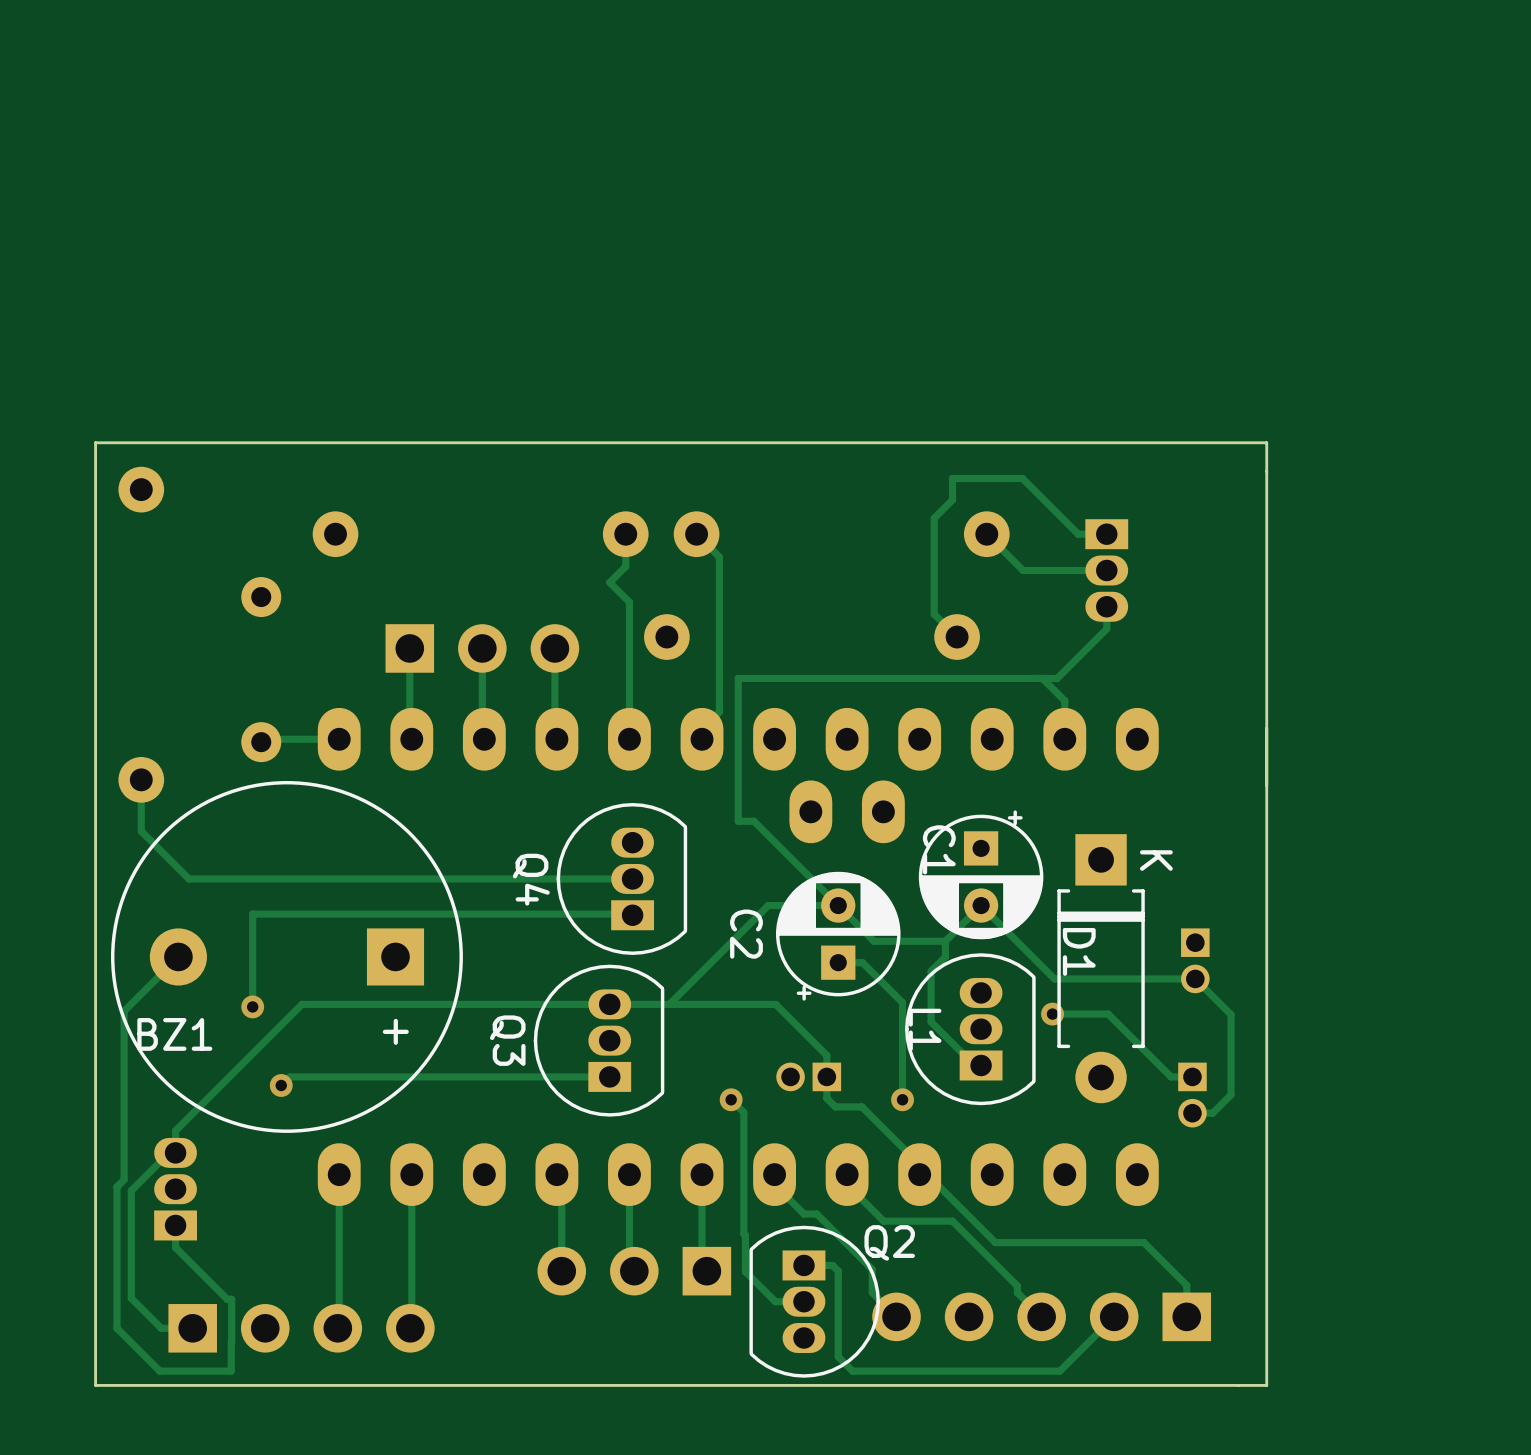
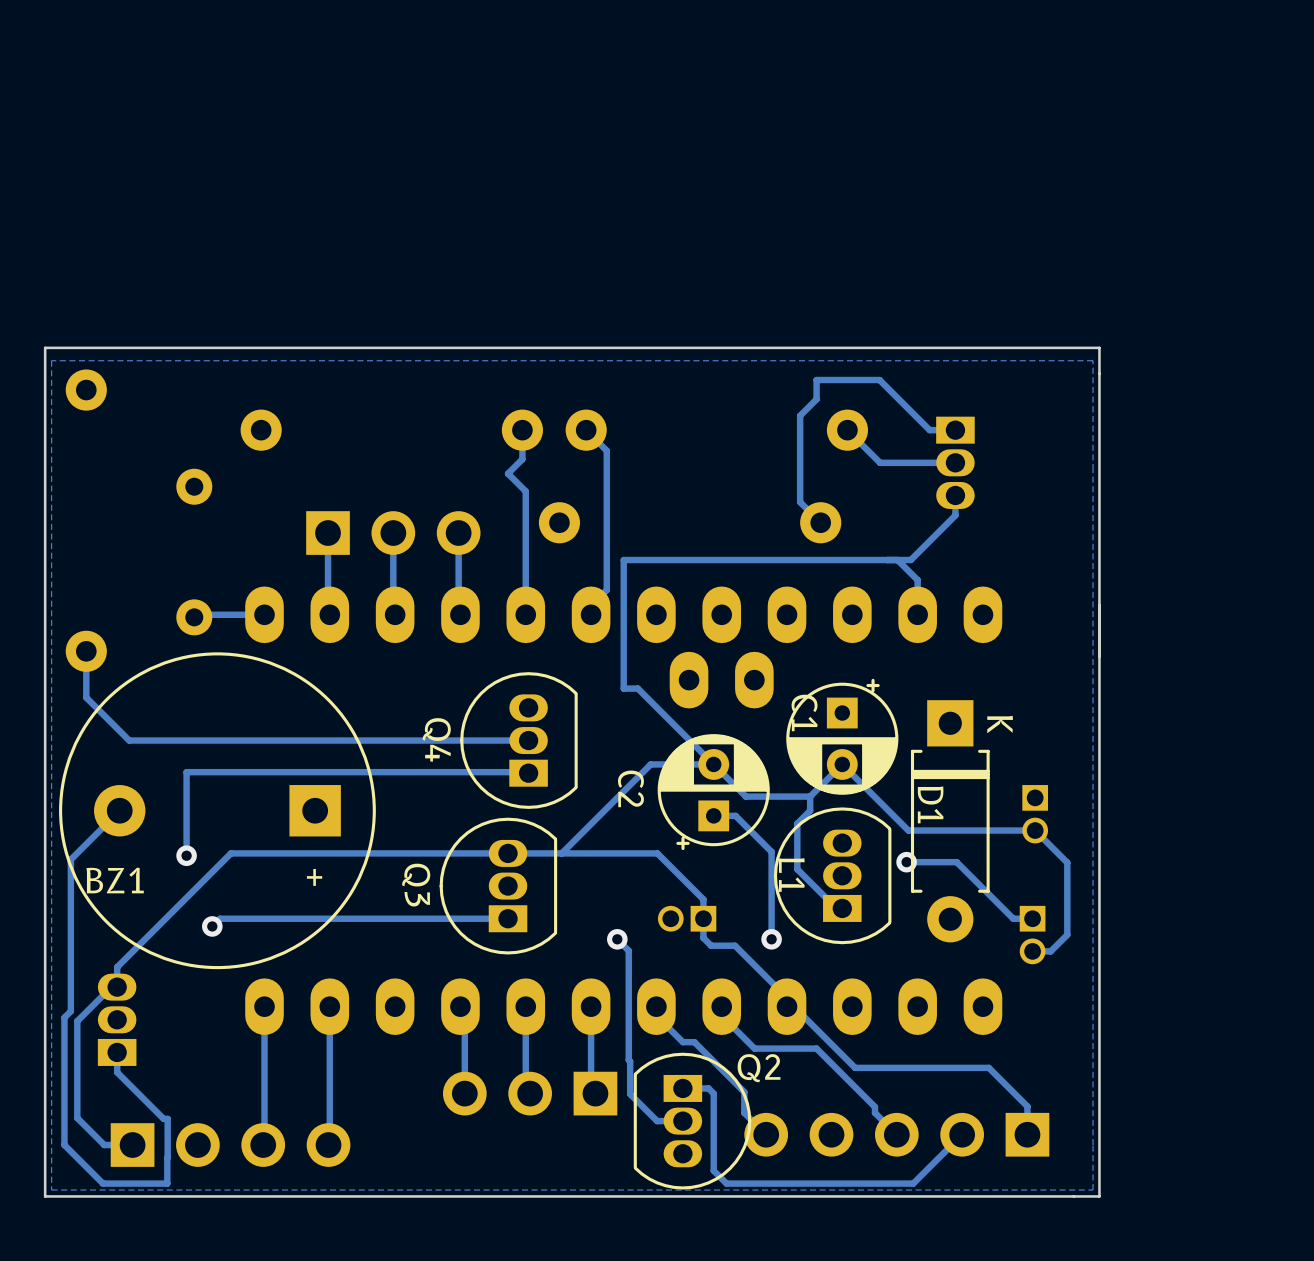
zone outline: none -> (1093, 360) (51, 360) (51, 1190) (1093, 1190) (1093, 360)

